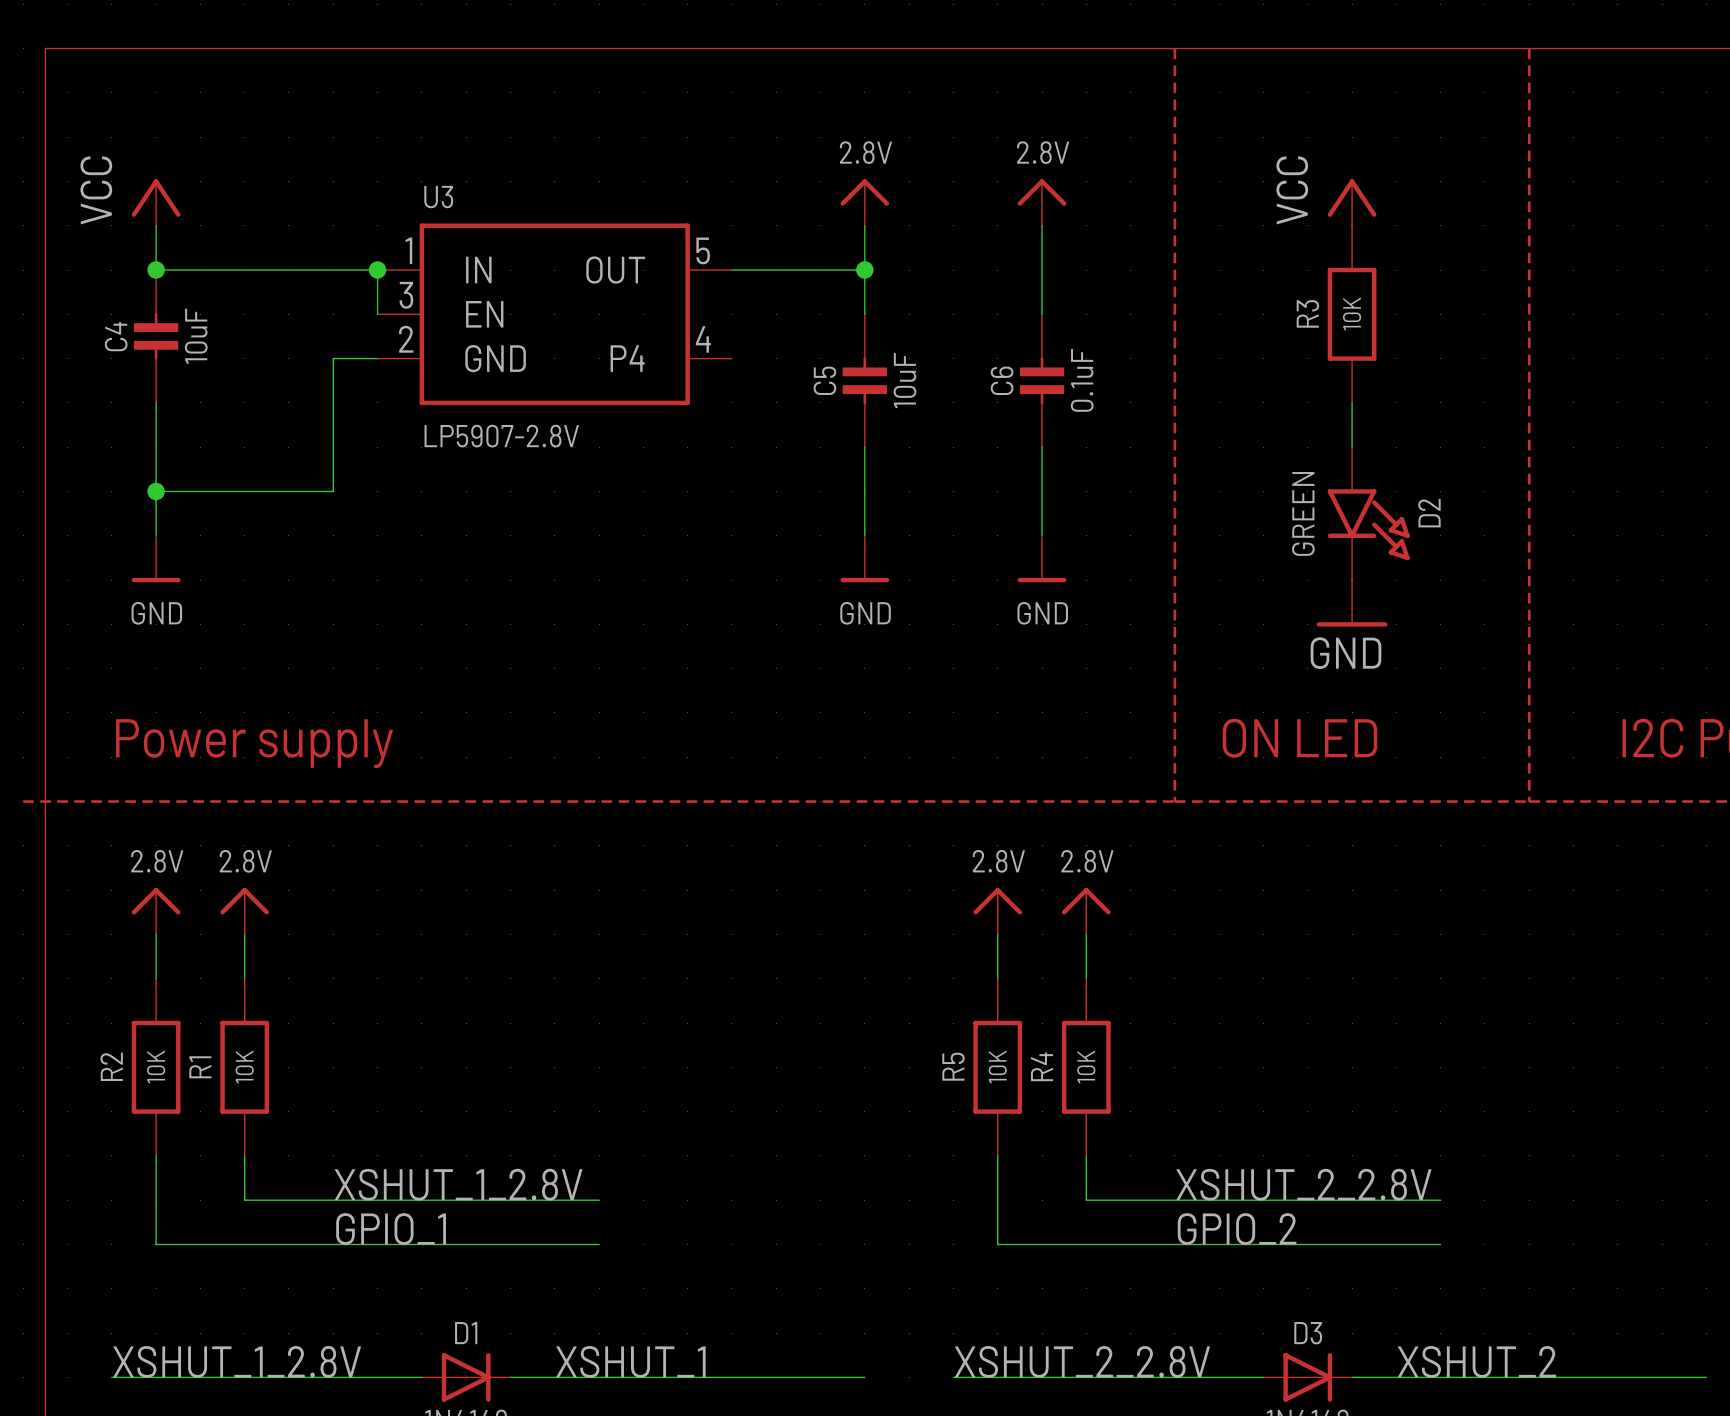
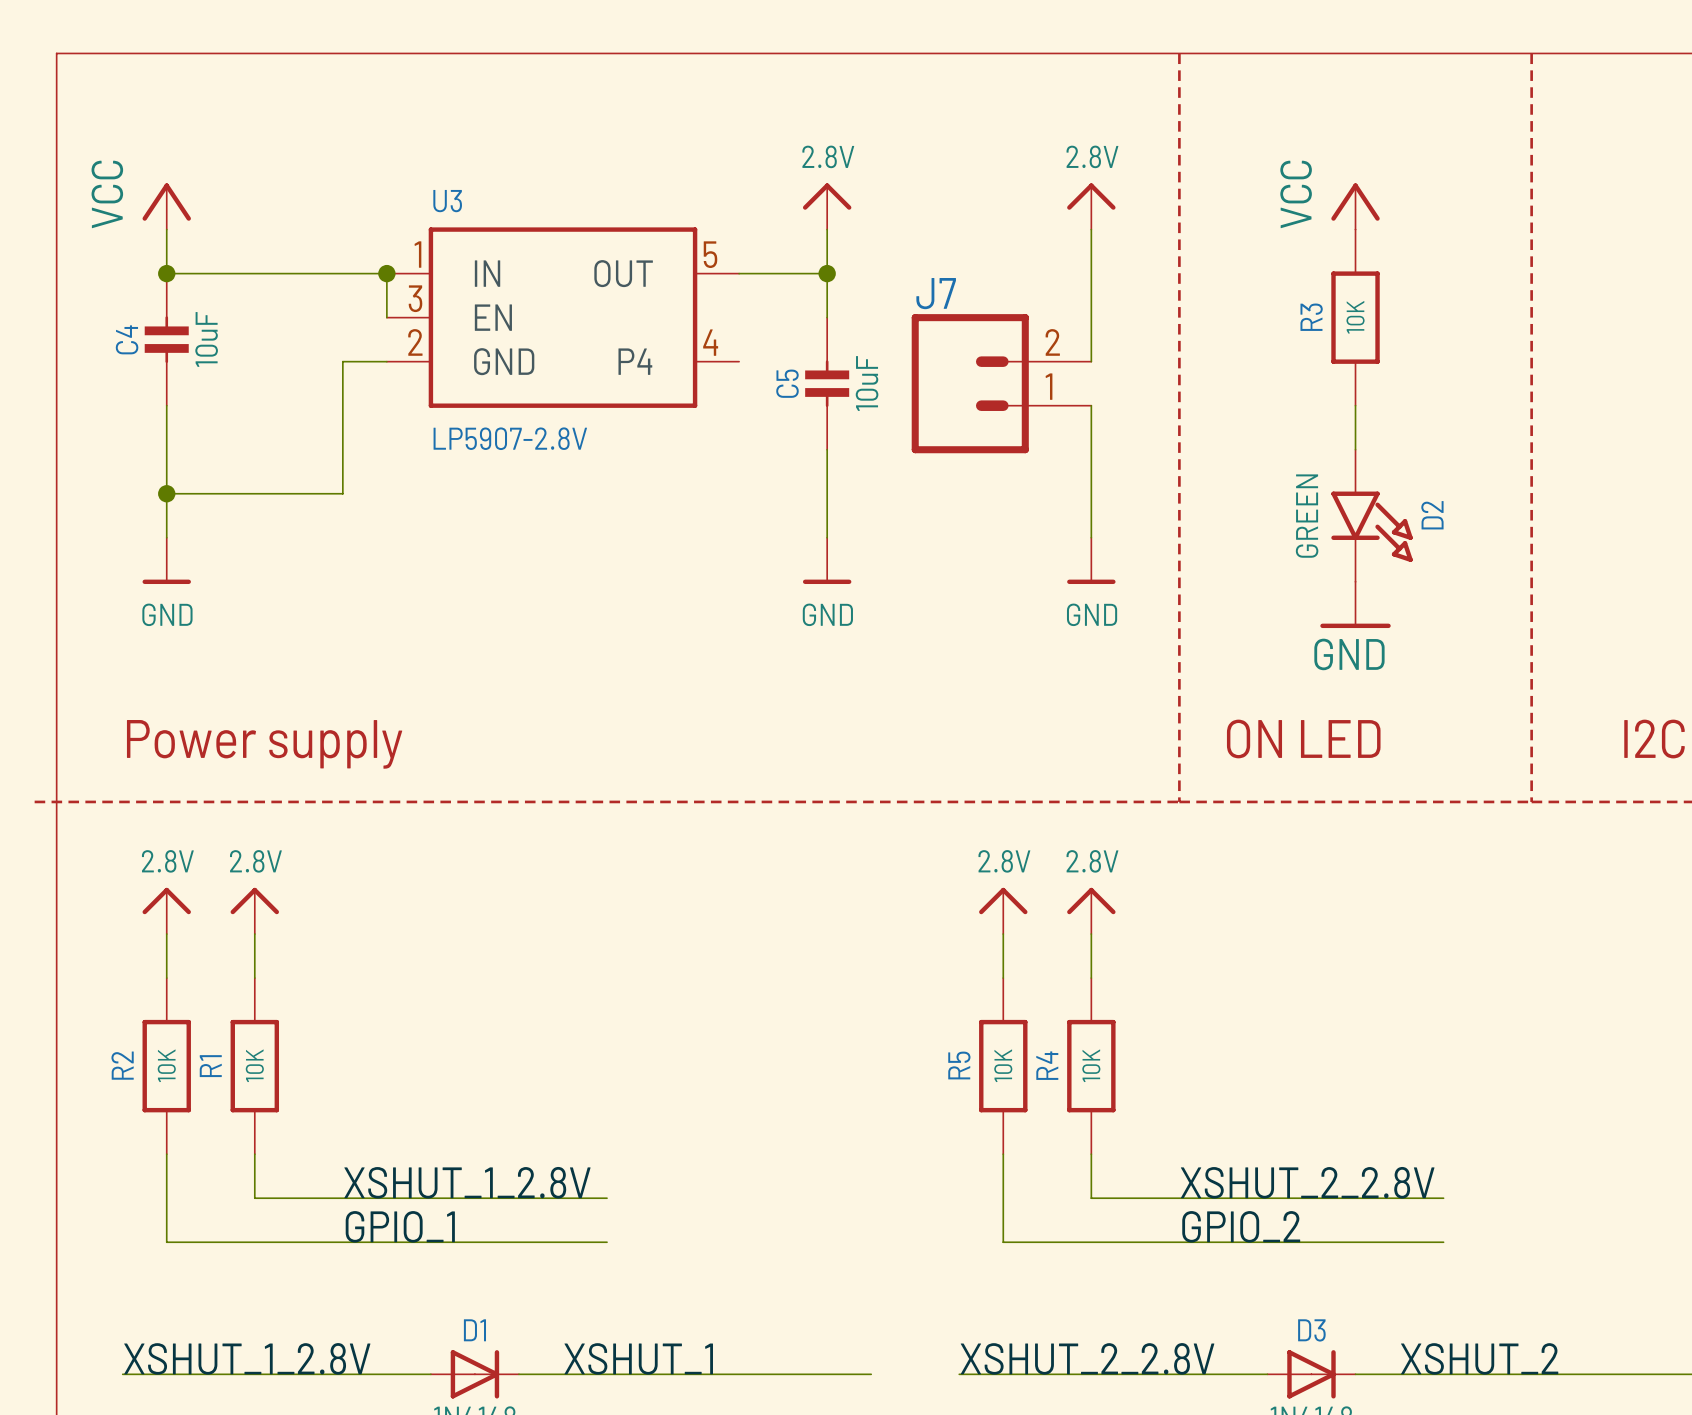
power symbol position: 2.8V (864, 202) -> 2.8V (827, 206)
power symbol position: 2.8V (1042, 202) -> 2.8V (1091, 206)
wire: (864, 225) (864, 314) -> (827, 229) (827, 317)
wire: (1042, 225) (1042, 314) -> none
wire: none -> (1091, 229) (1091, 361)
wire: (820, 270) (864, 270) -> none
junction position: (864, 270) -> (827, 273)
C5 position: (864, 380) -> (827, 383)
J7: none -> (1001, 383)
C6: 0.1uF (1042, 380) -> none
wire: none -> (1091, 405) (1091, 537)
wire: (864, 447) (864, 535) -> (827, 449) (827, 537)
wire: (1042, 447) (1042, 535) -> none
power symbol position: GND (864, 559) -> GND (827, 560)
power symbol position: GND (1042, 559) -> GND (1091, 560)

